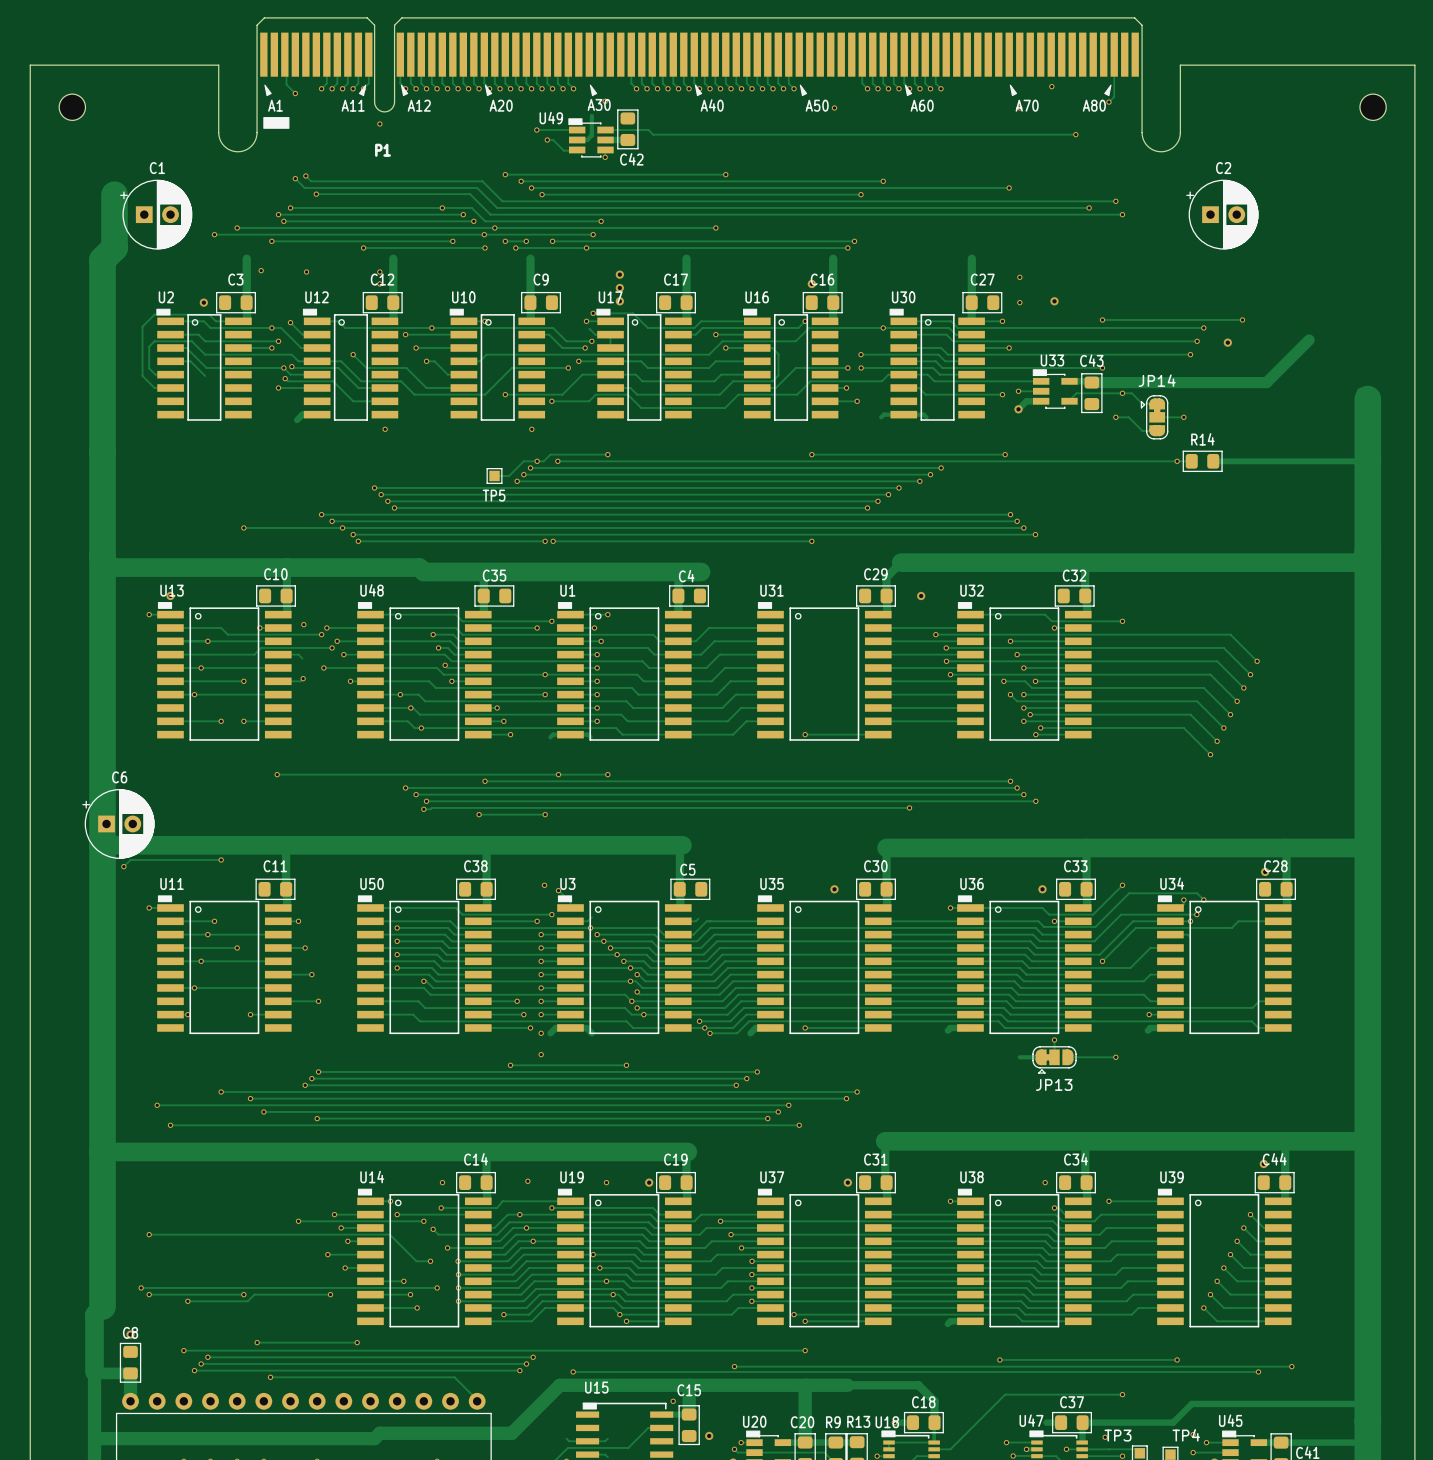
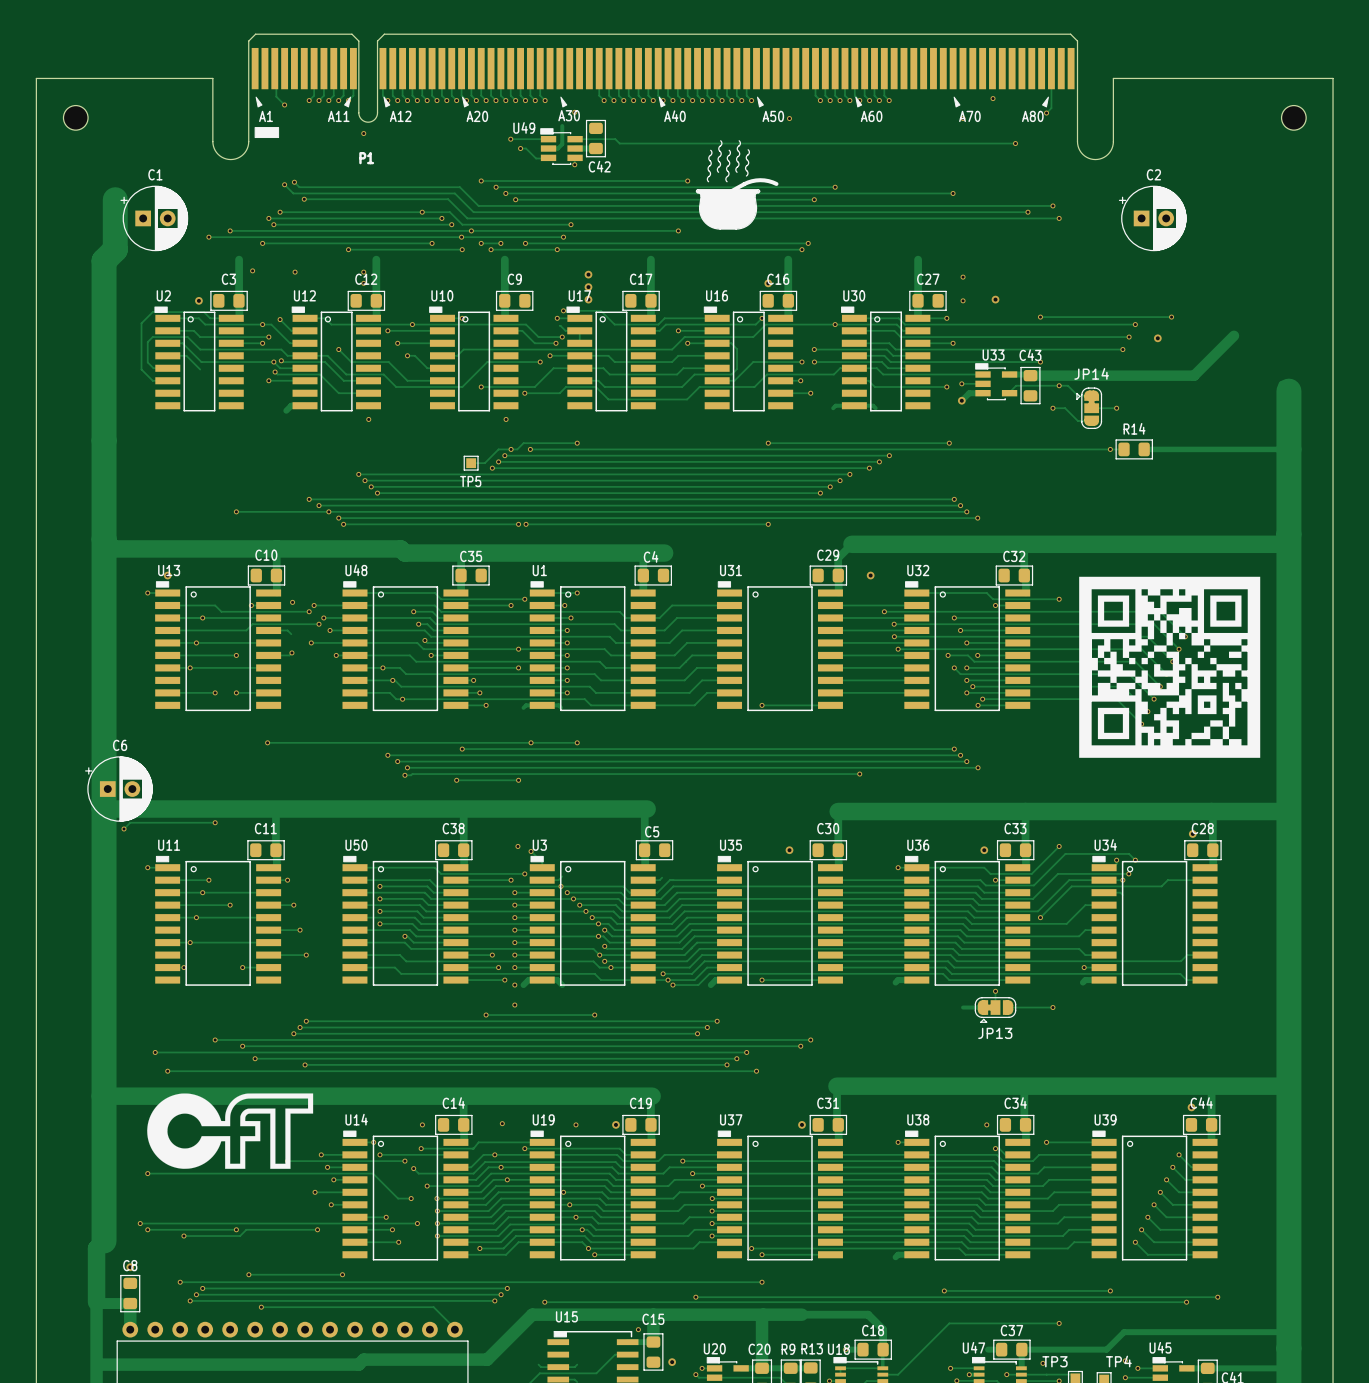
drawing: none -> [695, 140, 779, 230]
drawing: none -> [1079, 576, 1261, 758]
drawing: none -> [147, 1093, 314, 1169]

